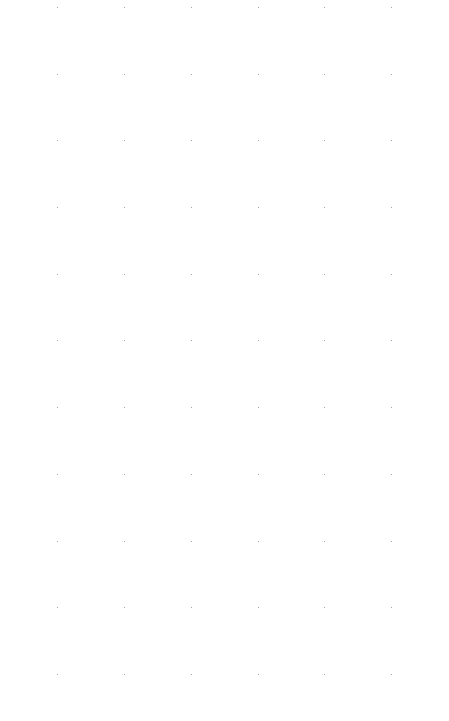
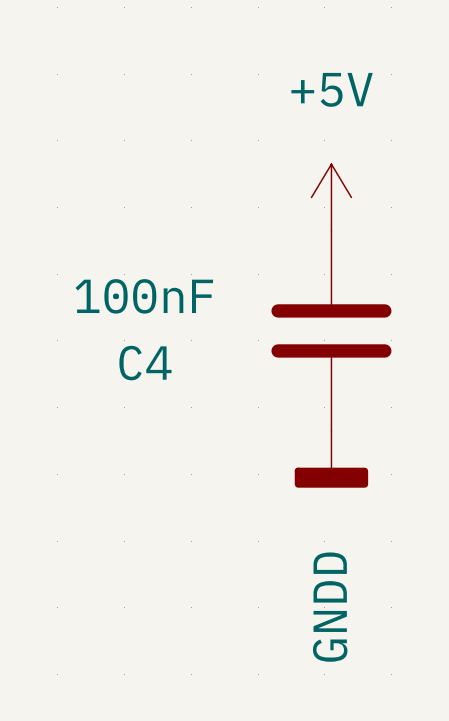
power symbol: none -> +5V (331, 197)
C4: none -> 100nF (331, 330)
power symbol: none -> GNDD (331, 459)

